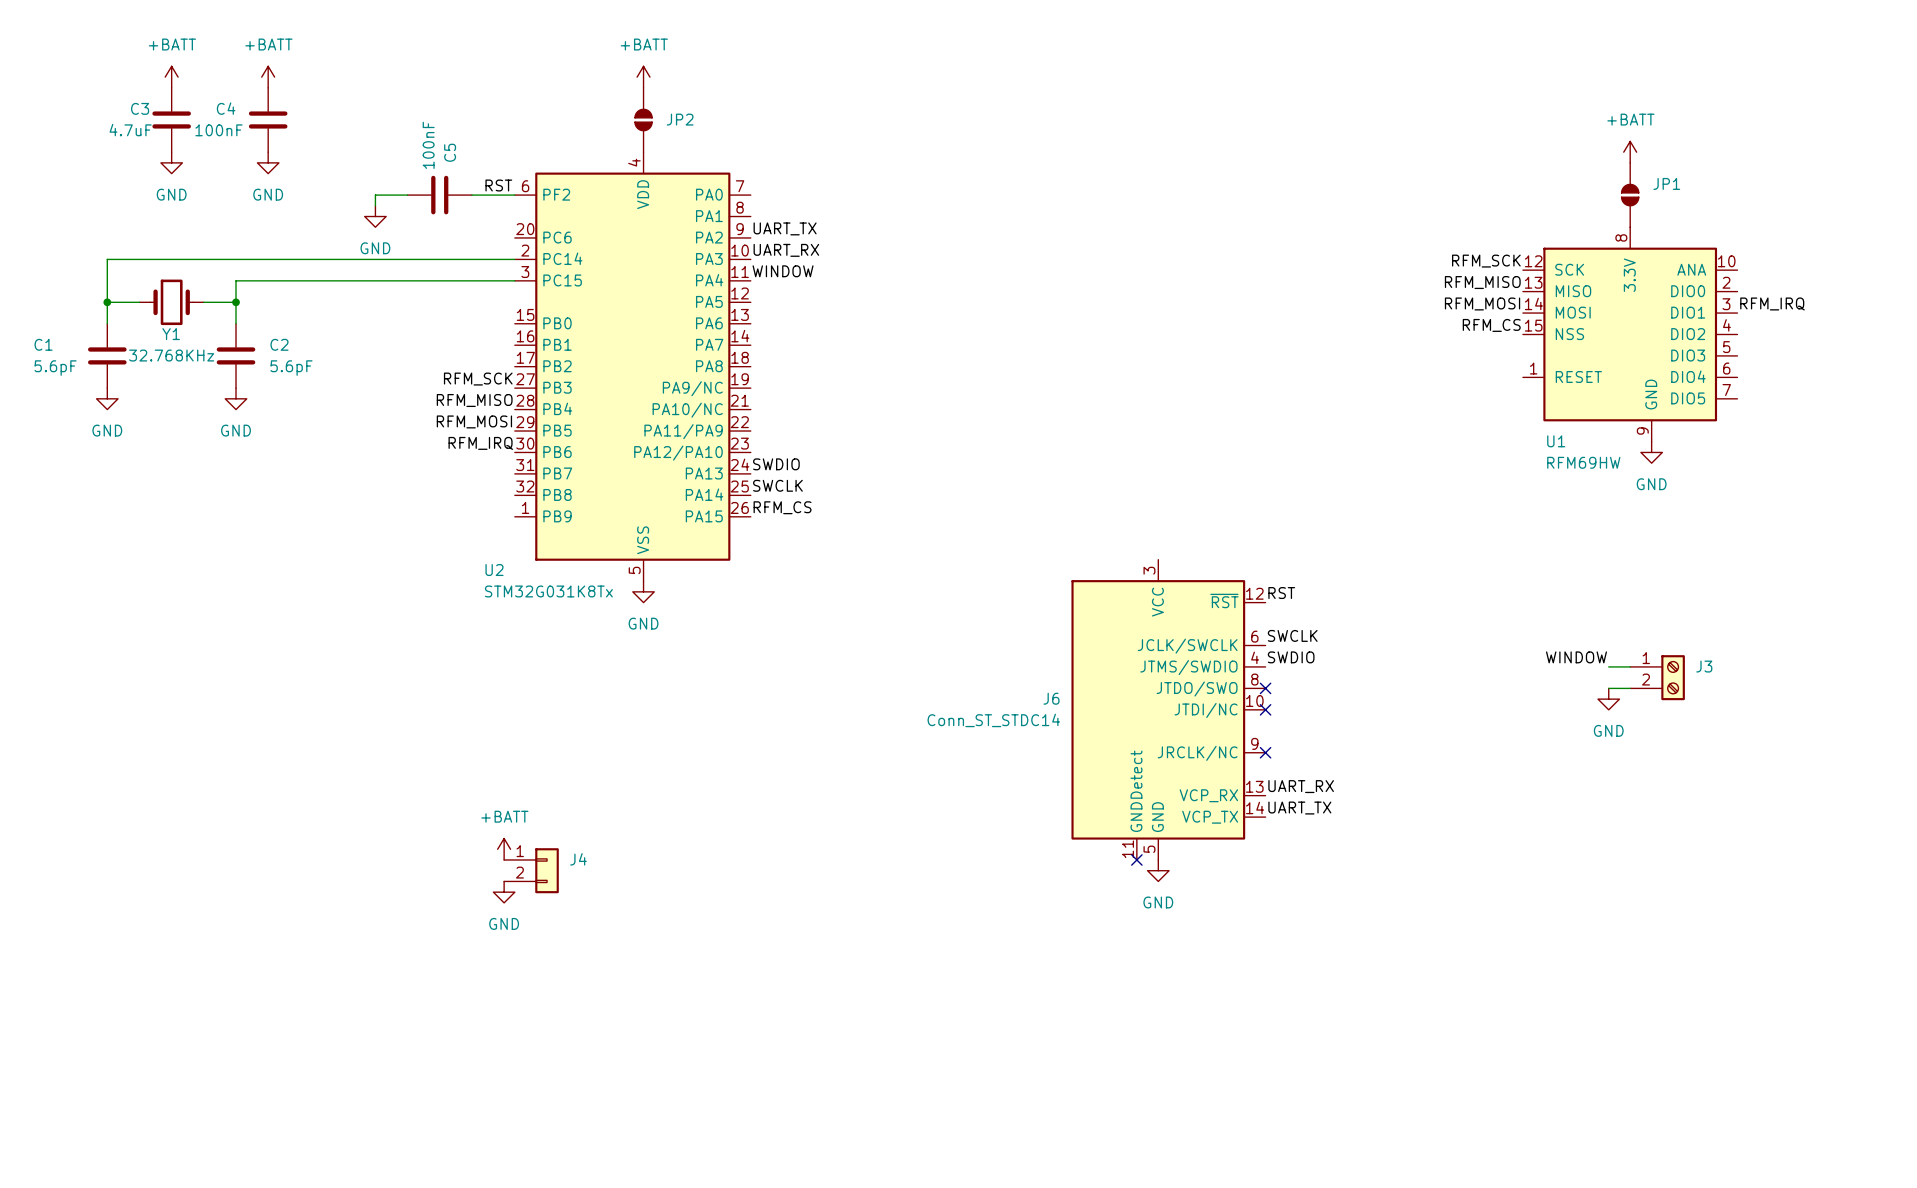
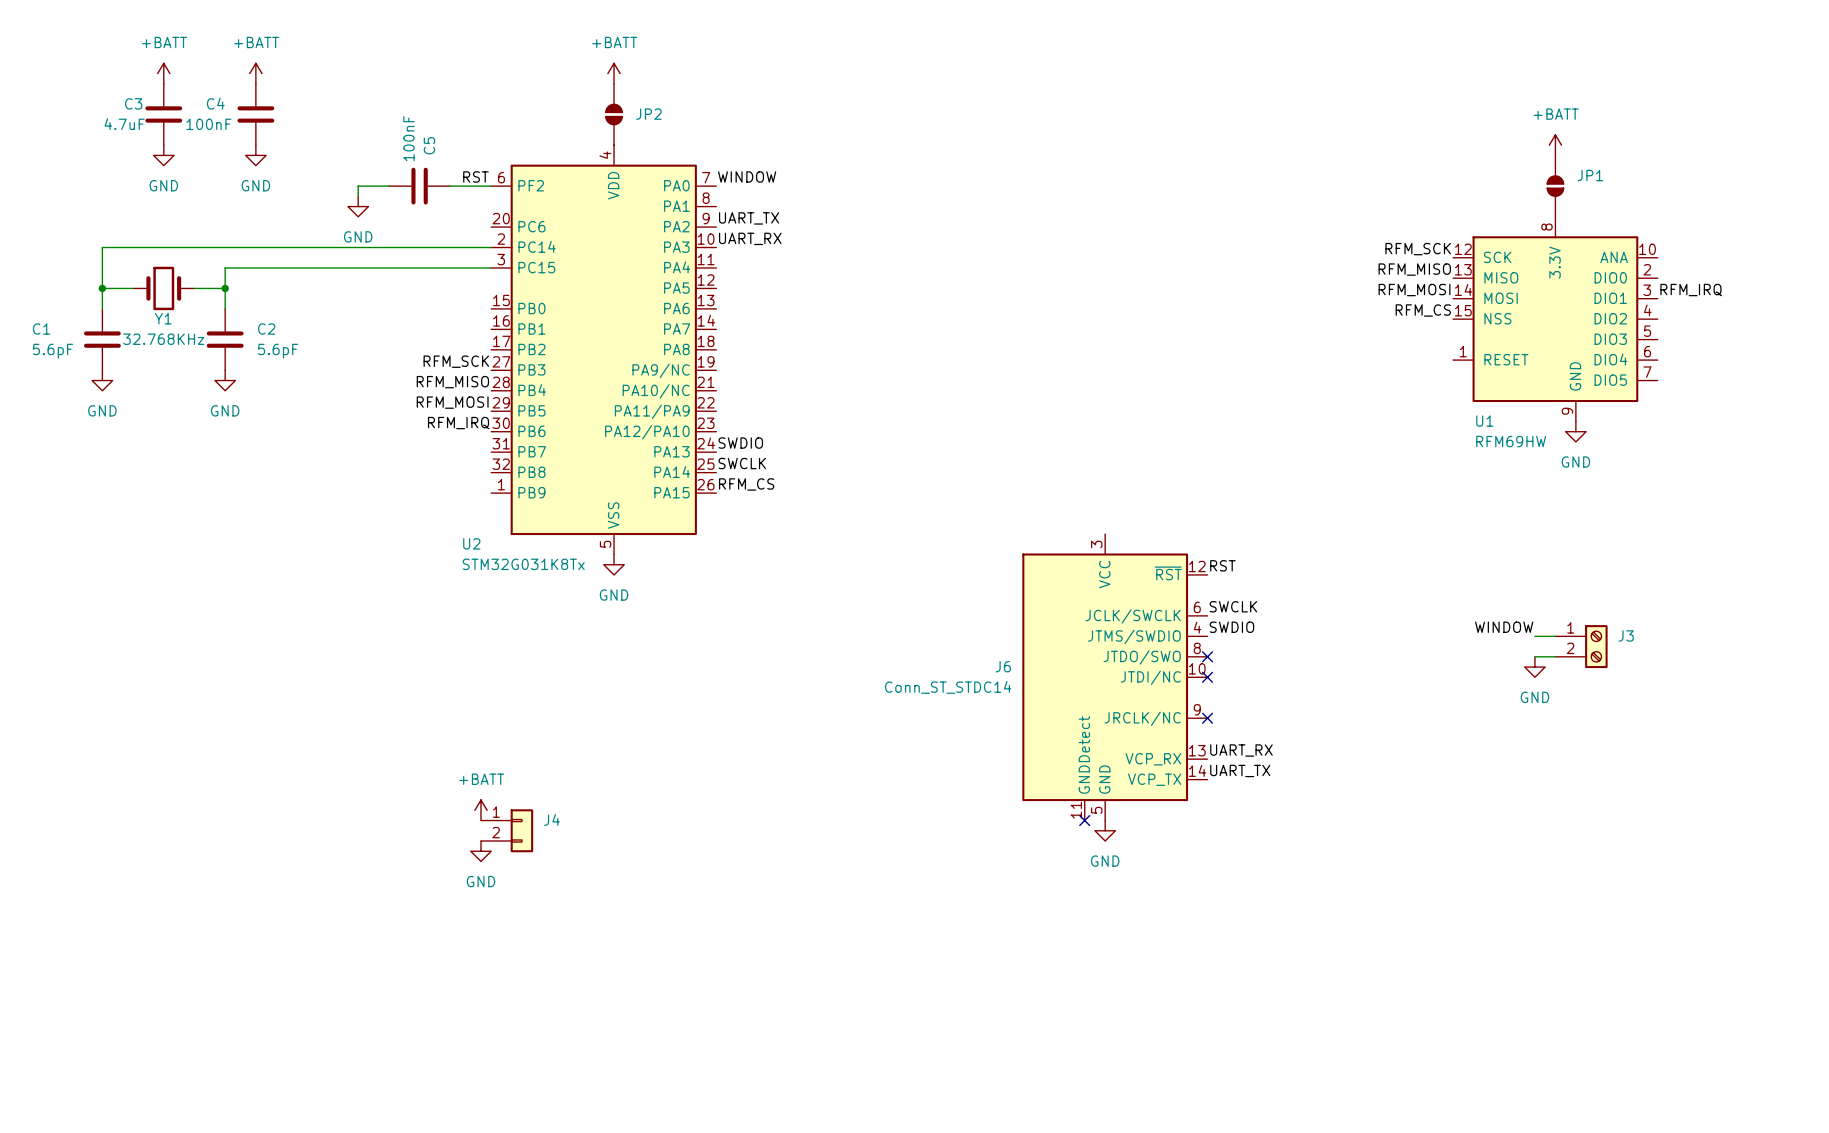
label position: WINDOW (783, 271) -> WINDOW (747, 176)

